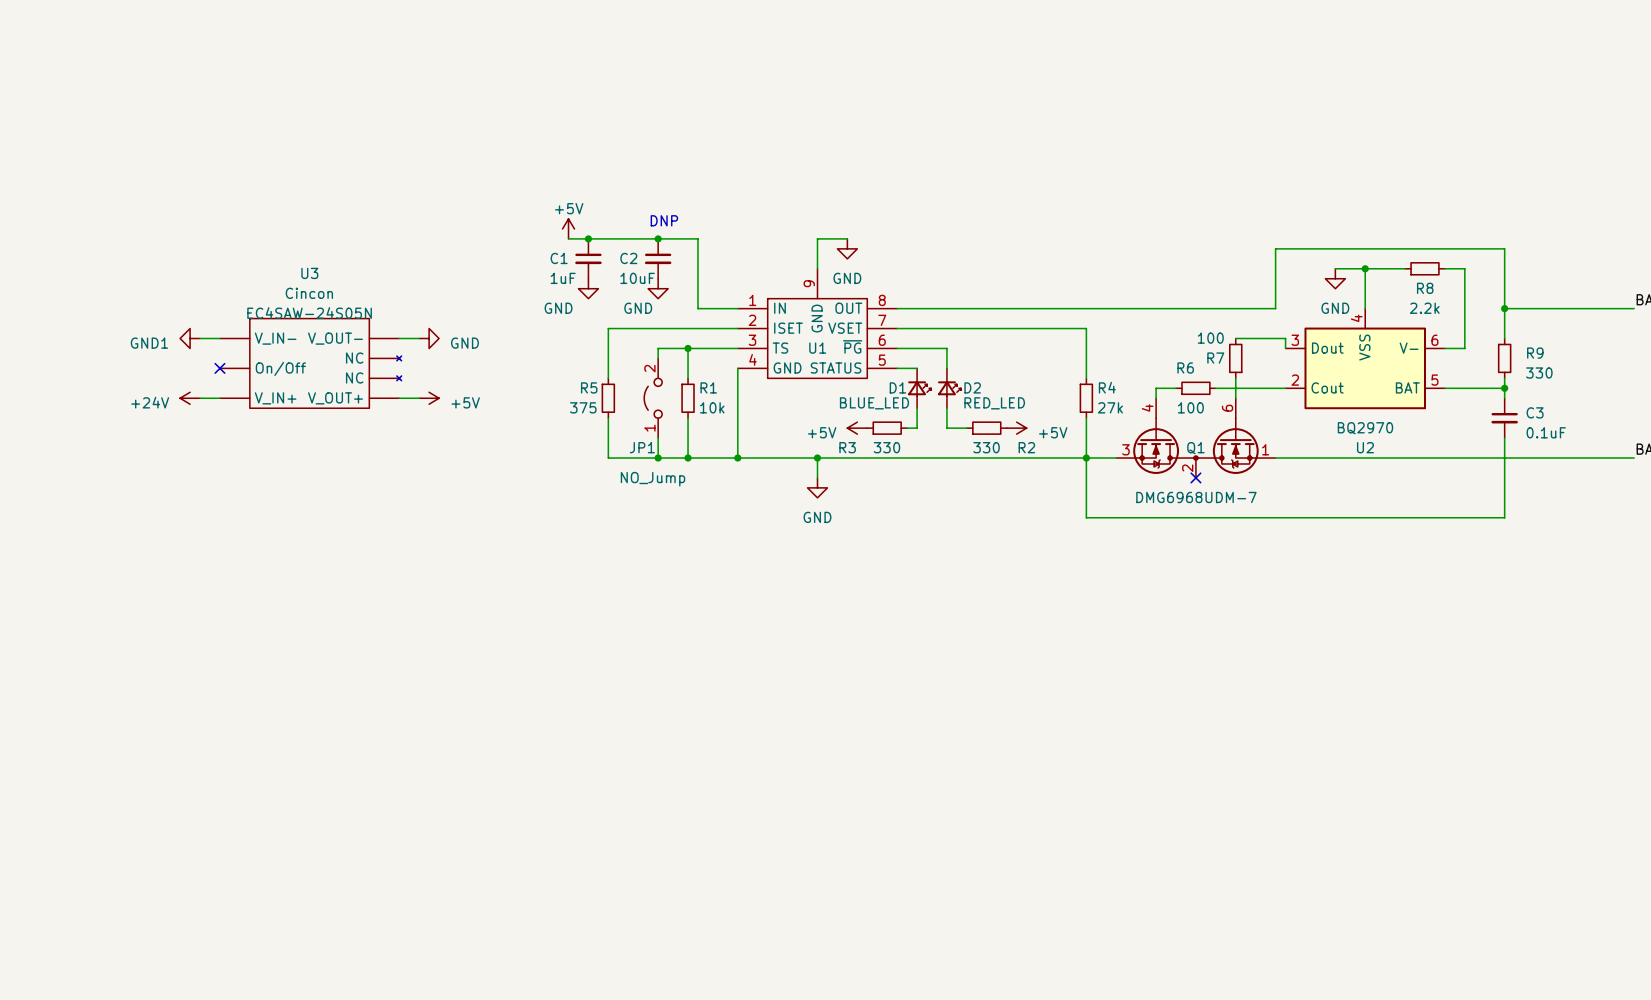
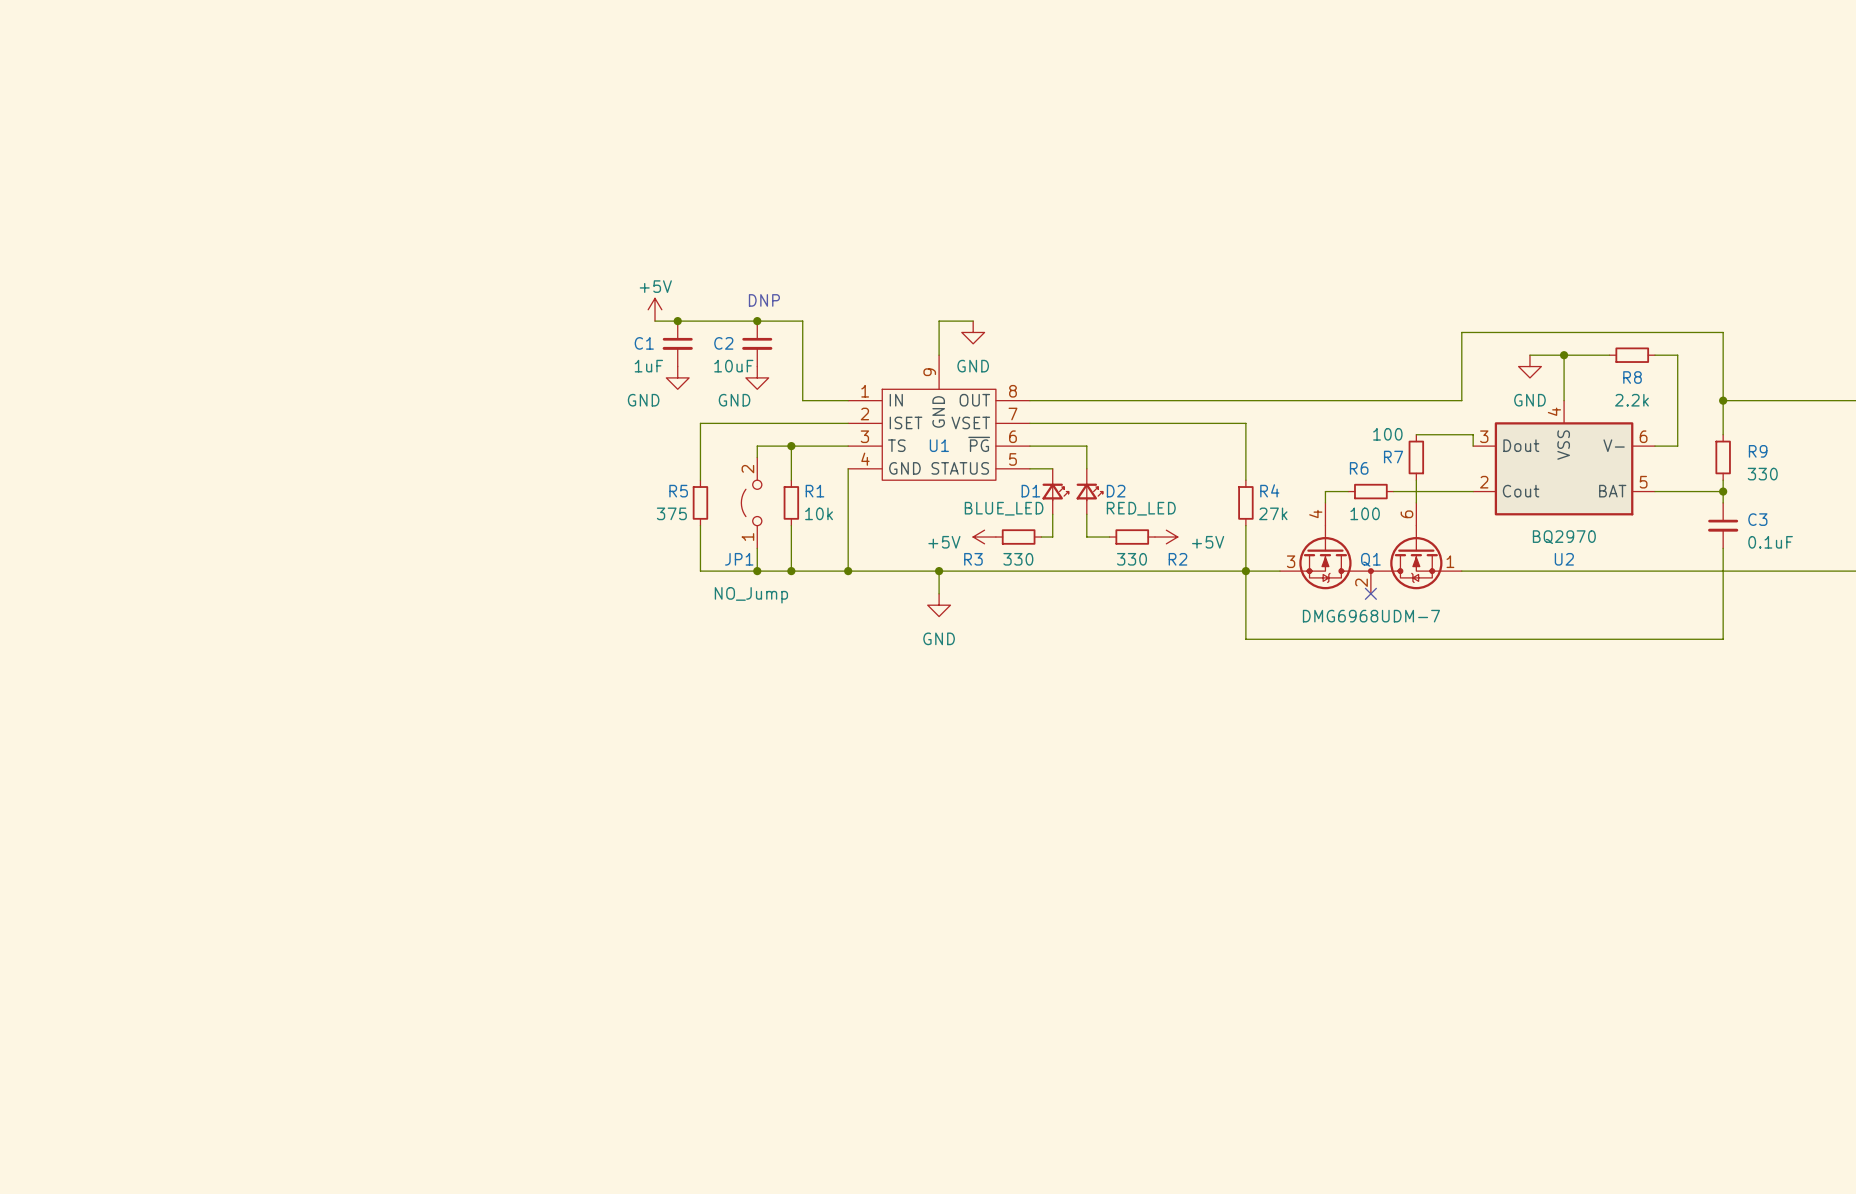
power symbol: GND1 (190, 338) -> none
wire: (200, 338) (219, 338) -> none
wire: (399, 338) (419, 338) -> none
power symbol: GND (429, 338) -> none
U3: (310, 363) -> none
no-connect mark: (219, 368) -> none
power symbol: +24V (190, 398) -> none
wire: (200, 398) (219, 398) -> none
wire: (399, 398) (419, 398) -> none
power symbol: +5V (429, 398) -> none

